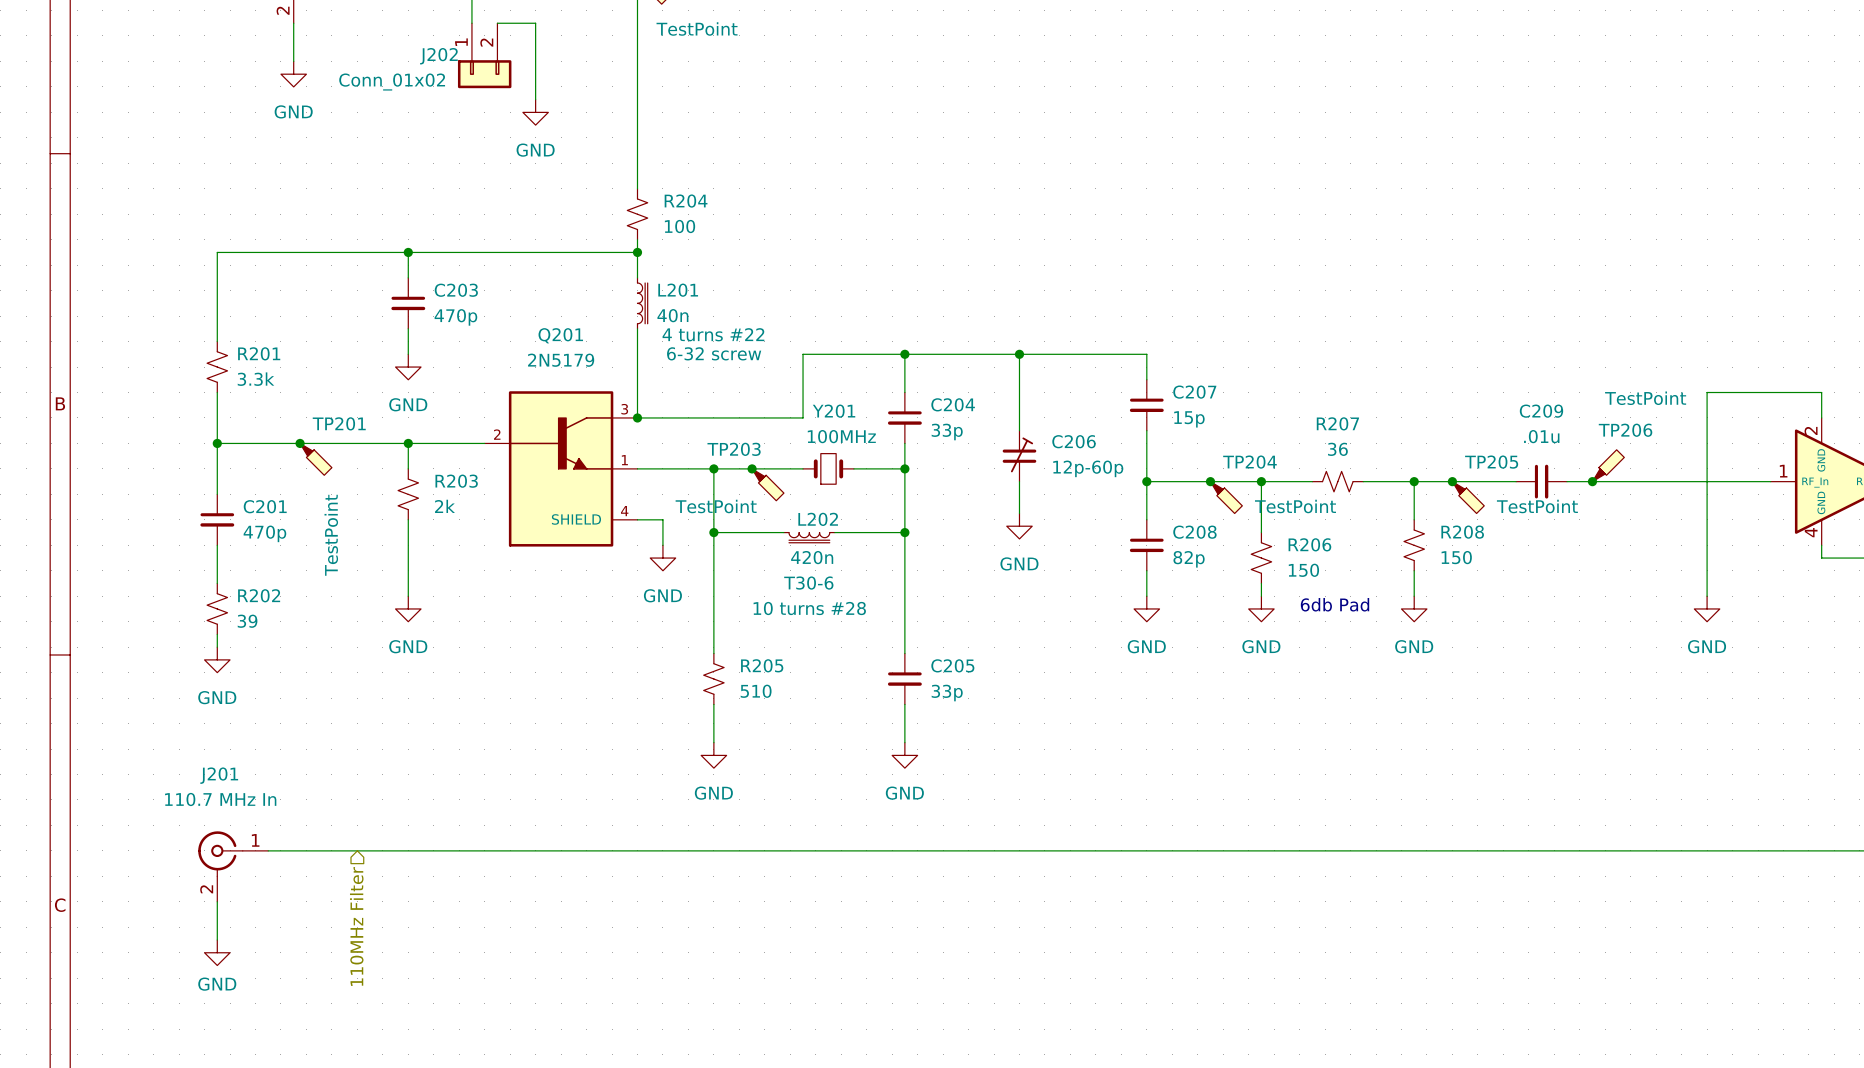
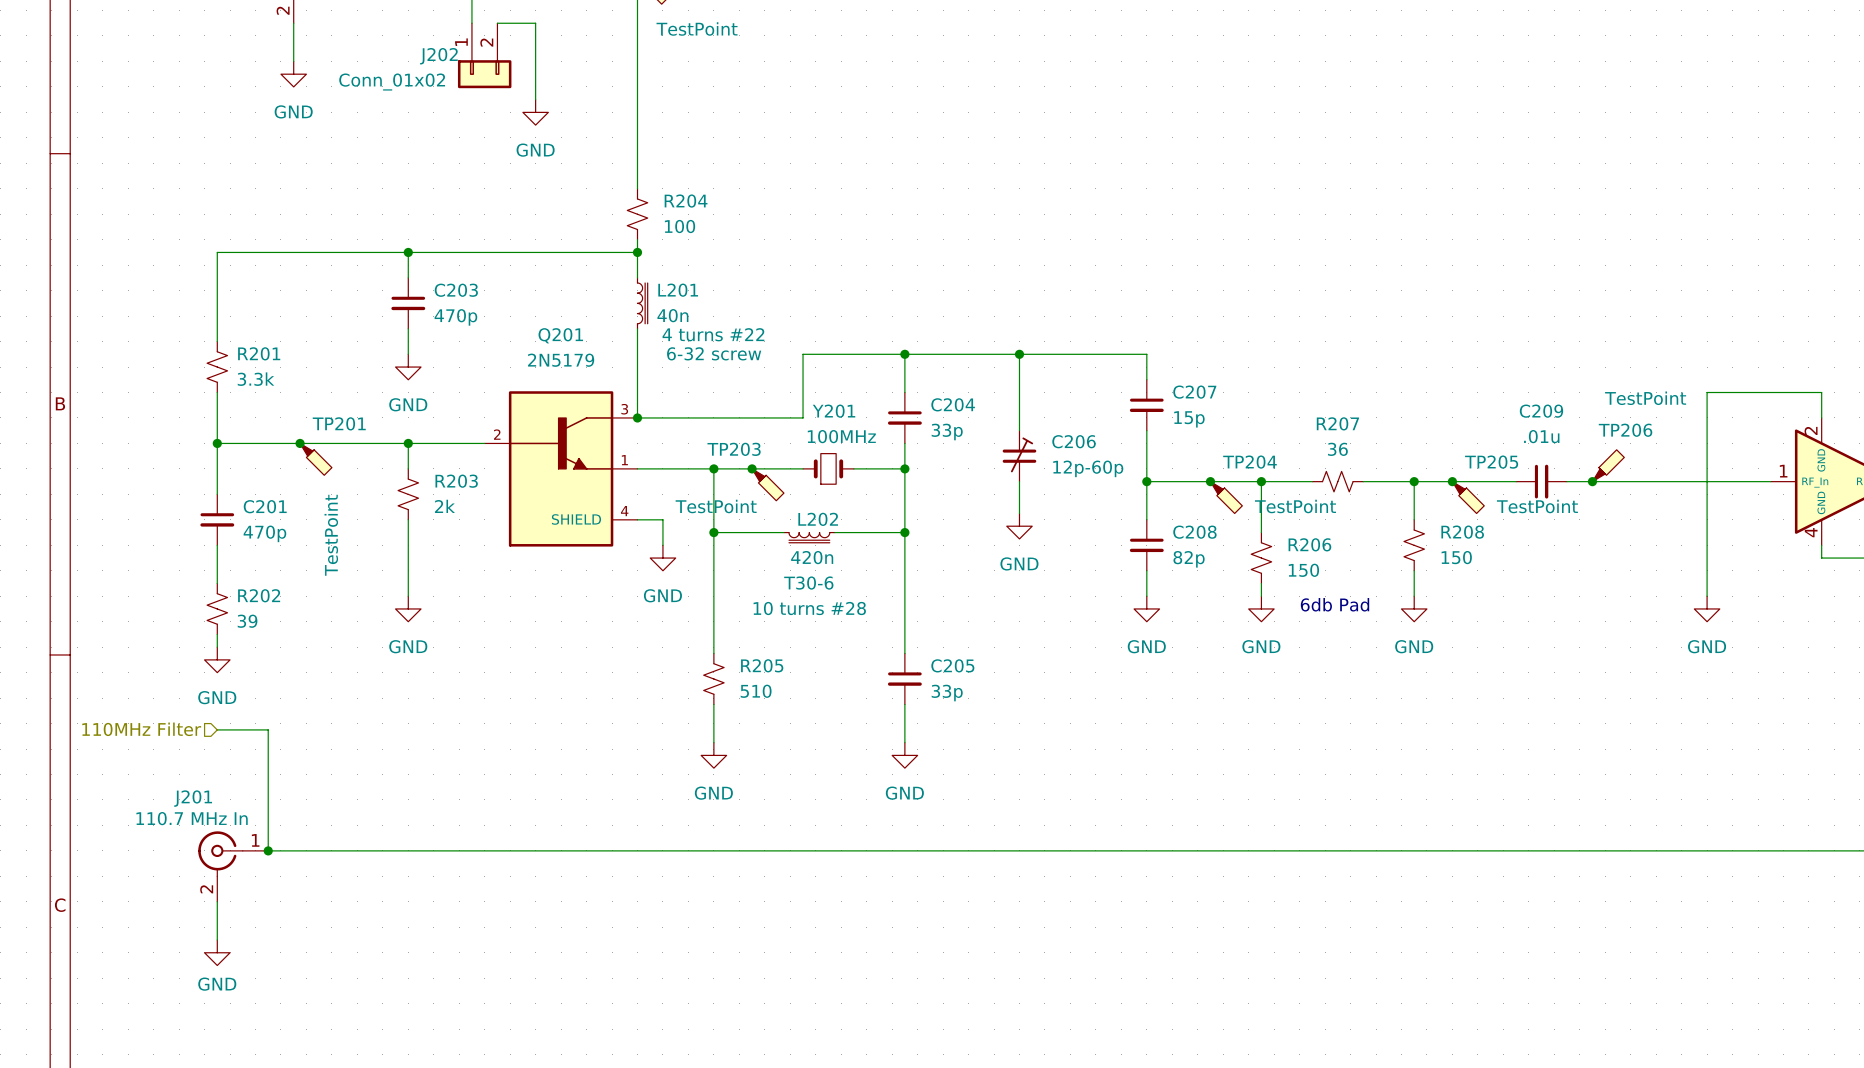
wire: none -> (217, 729) (268, 729) (268, 850)
J201 name position: J201 (219, 775) -> J201 (193, 798)
J201 value position: 110.7 MHz In (220, 799) -> 110.7 MHz In (192, 818)
junction: none -> (268, 850)
hierarchical label rotation: 0° (356, 926) -> 90° clockwise (141, 729)
hierarchical label position: 110MHz Filter (356, 926) -> 110MHz Filter (141, 729)

